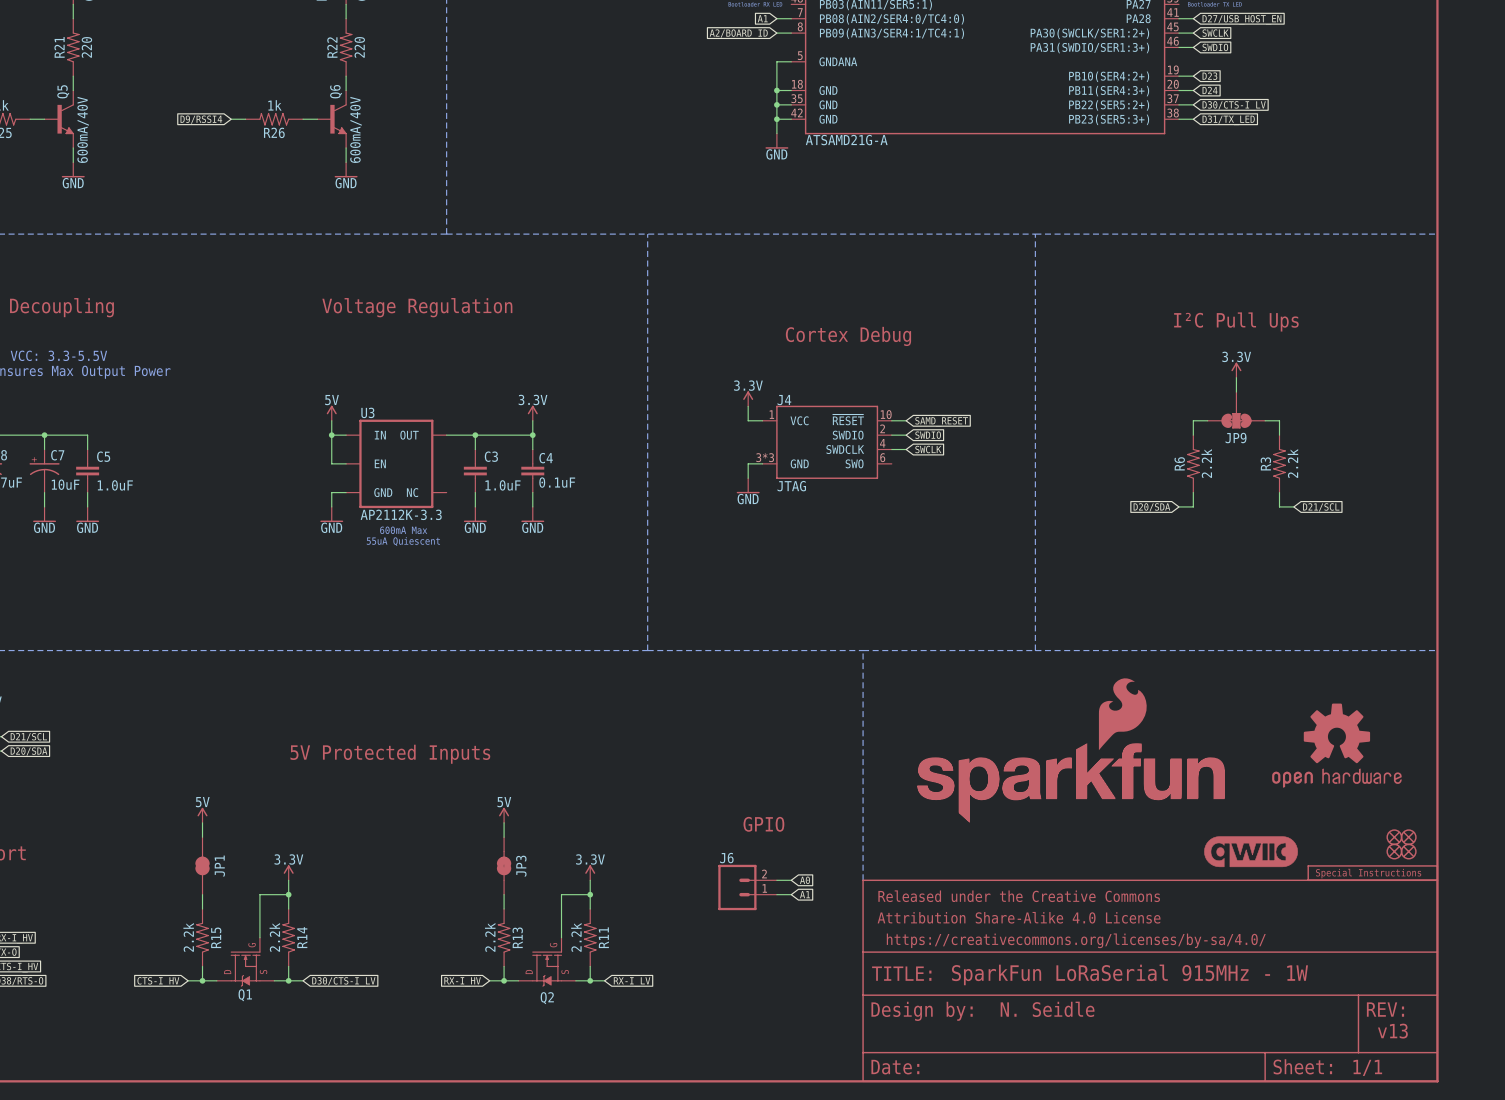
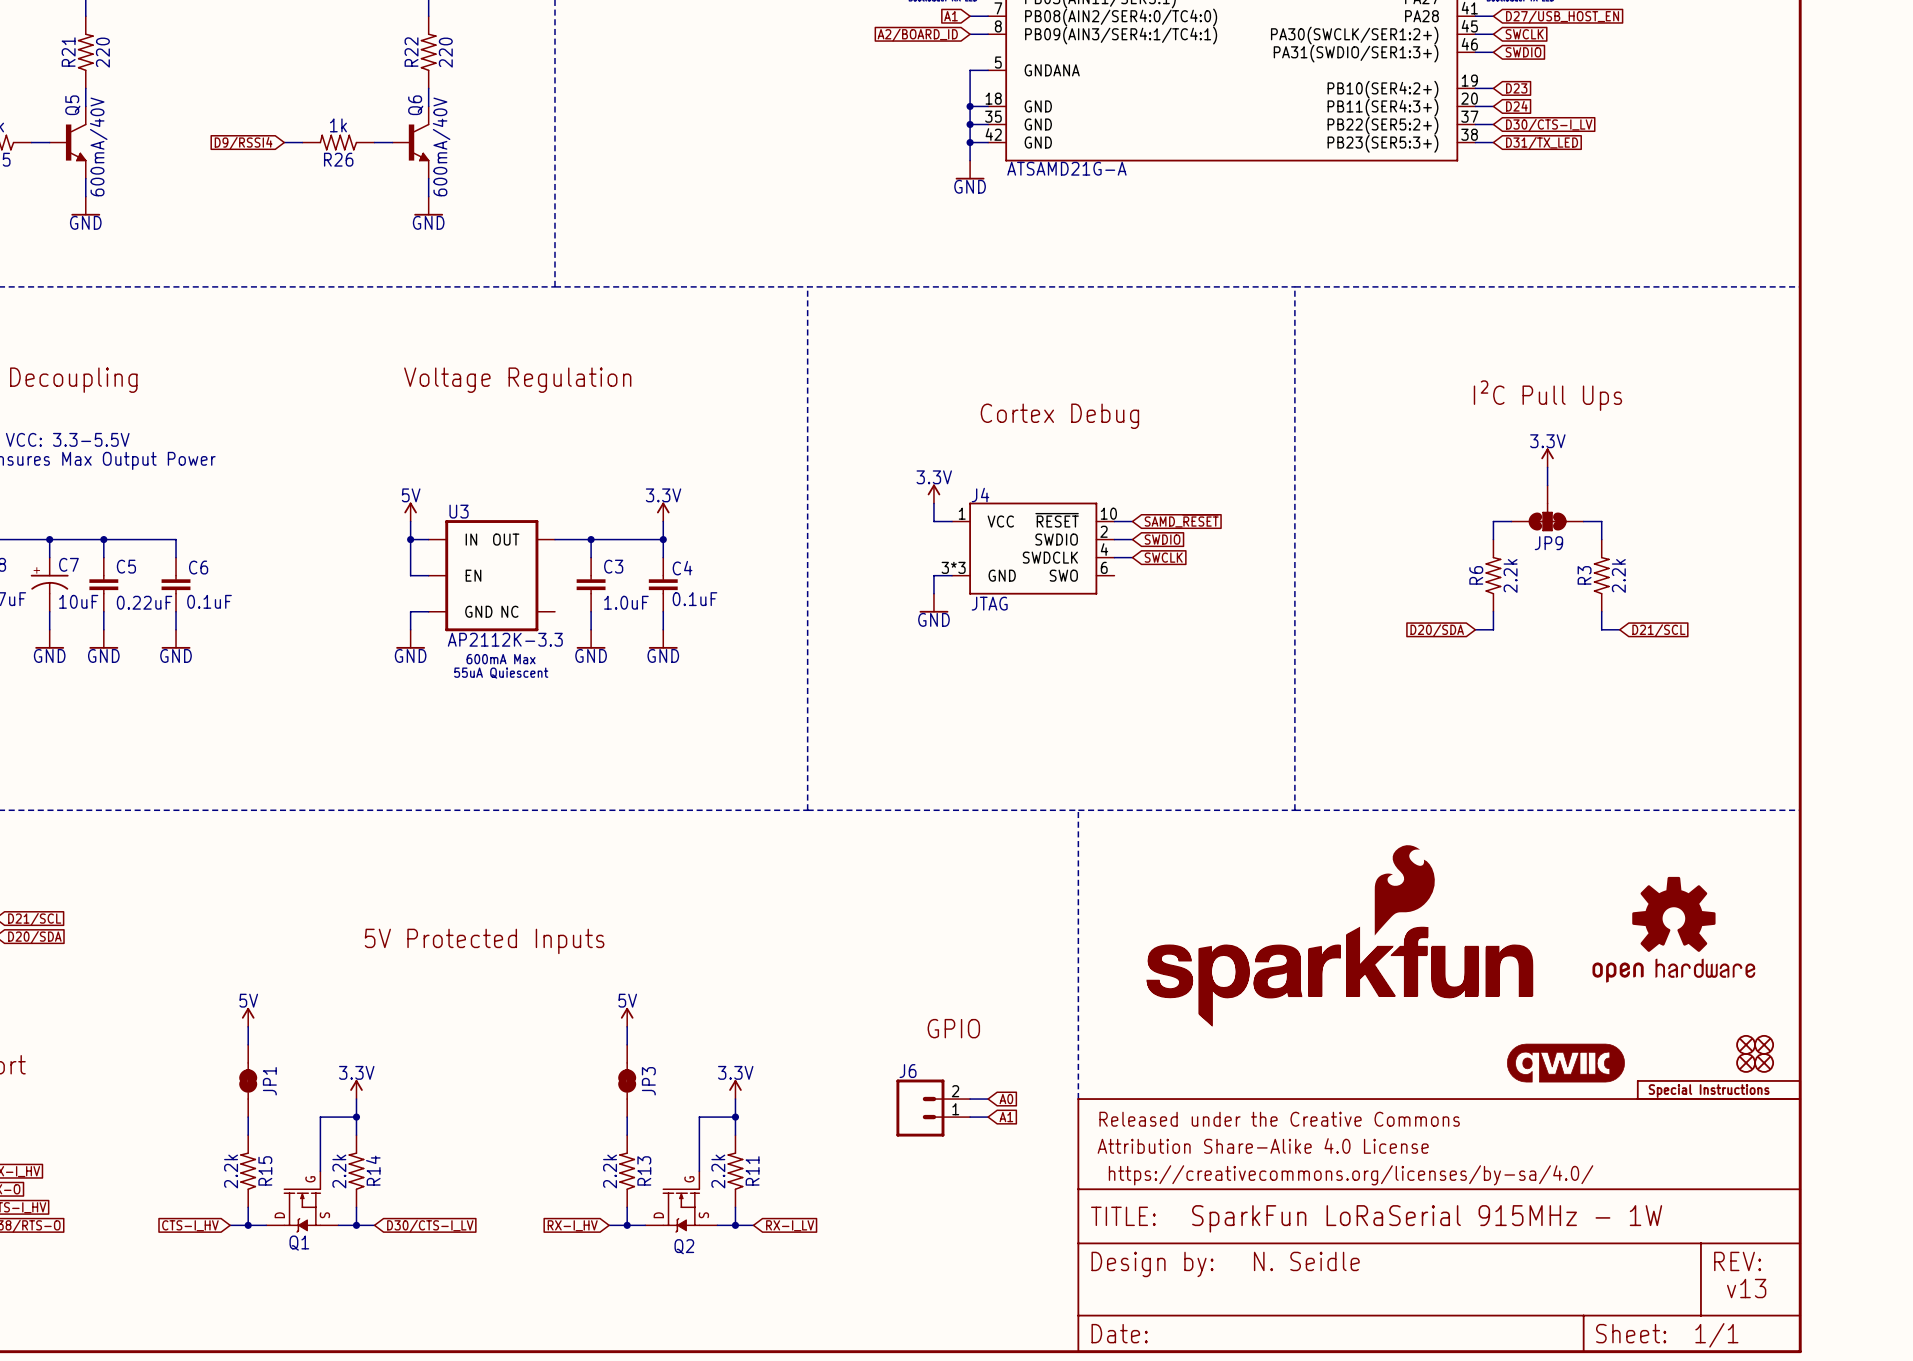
wire: none -> (103, 539) (176, 539) (176, 557)
junction: none -> (103, 539)
C6: none -> 0.1uF (176, 584)
C5 value: 1.0uF (115, 485) -> 0.22uF (144, 602)
wire: none -> (176, 611) (176, 629)
power symbol: none -> GND (176, 639)

